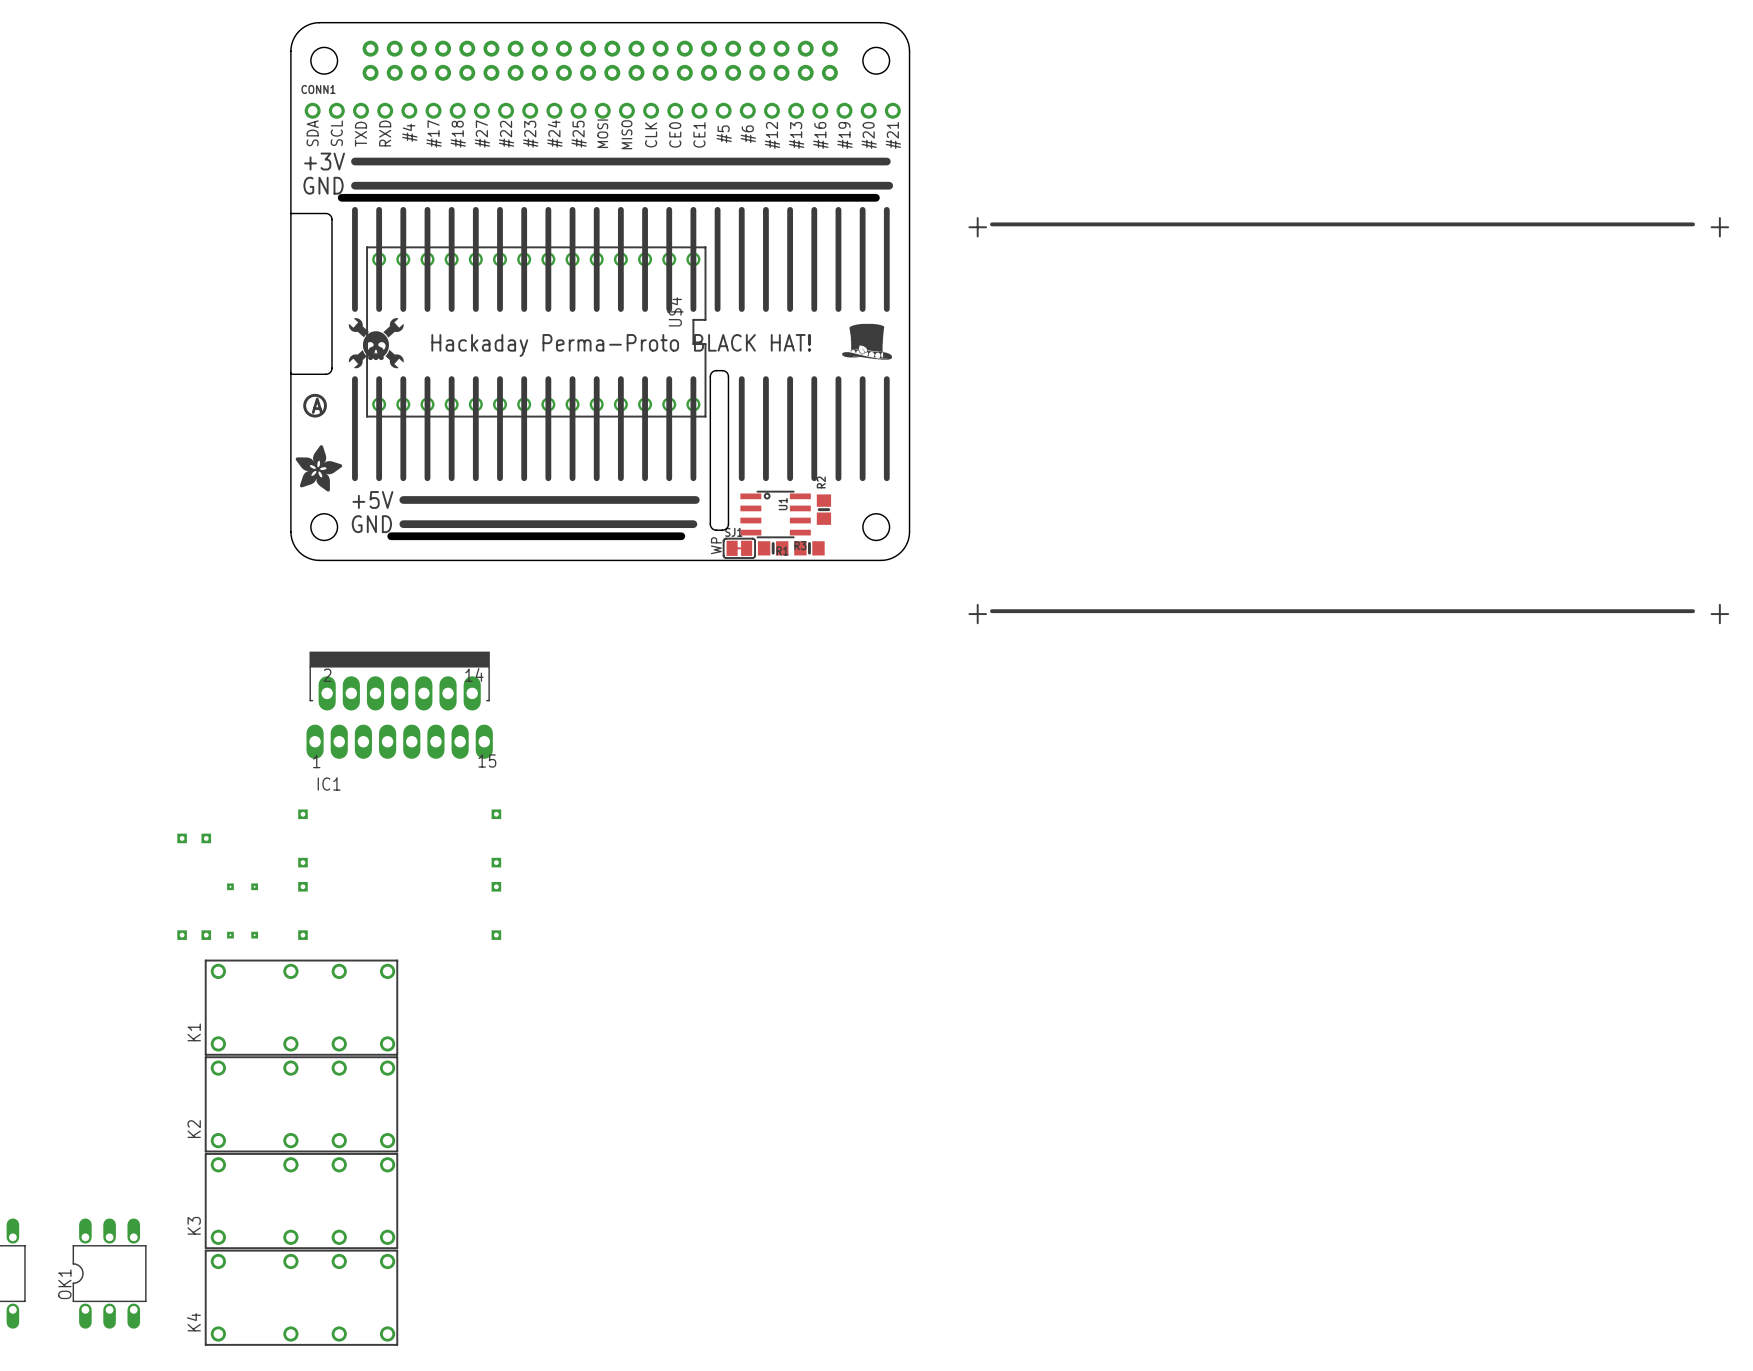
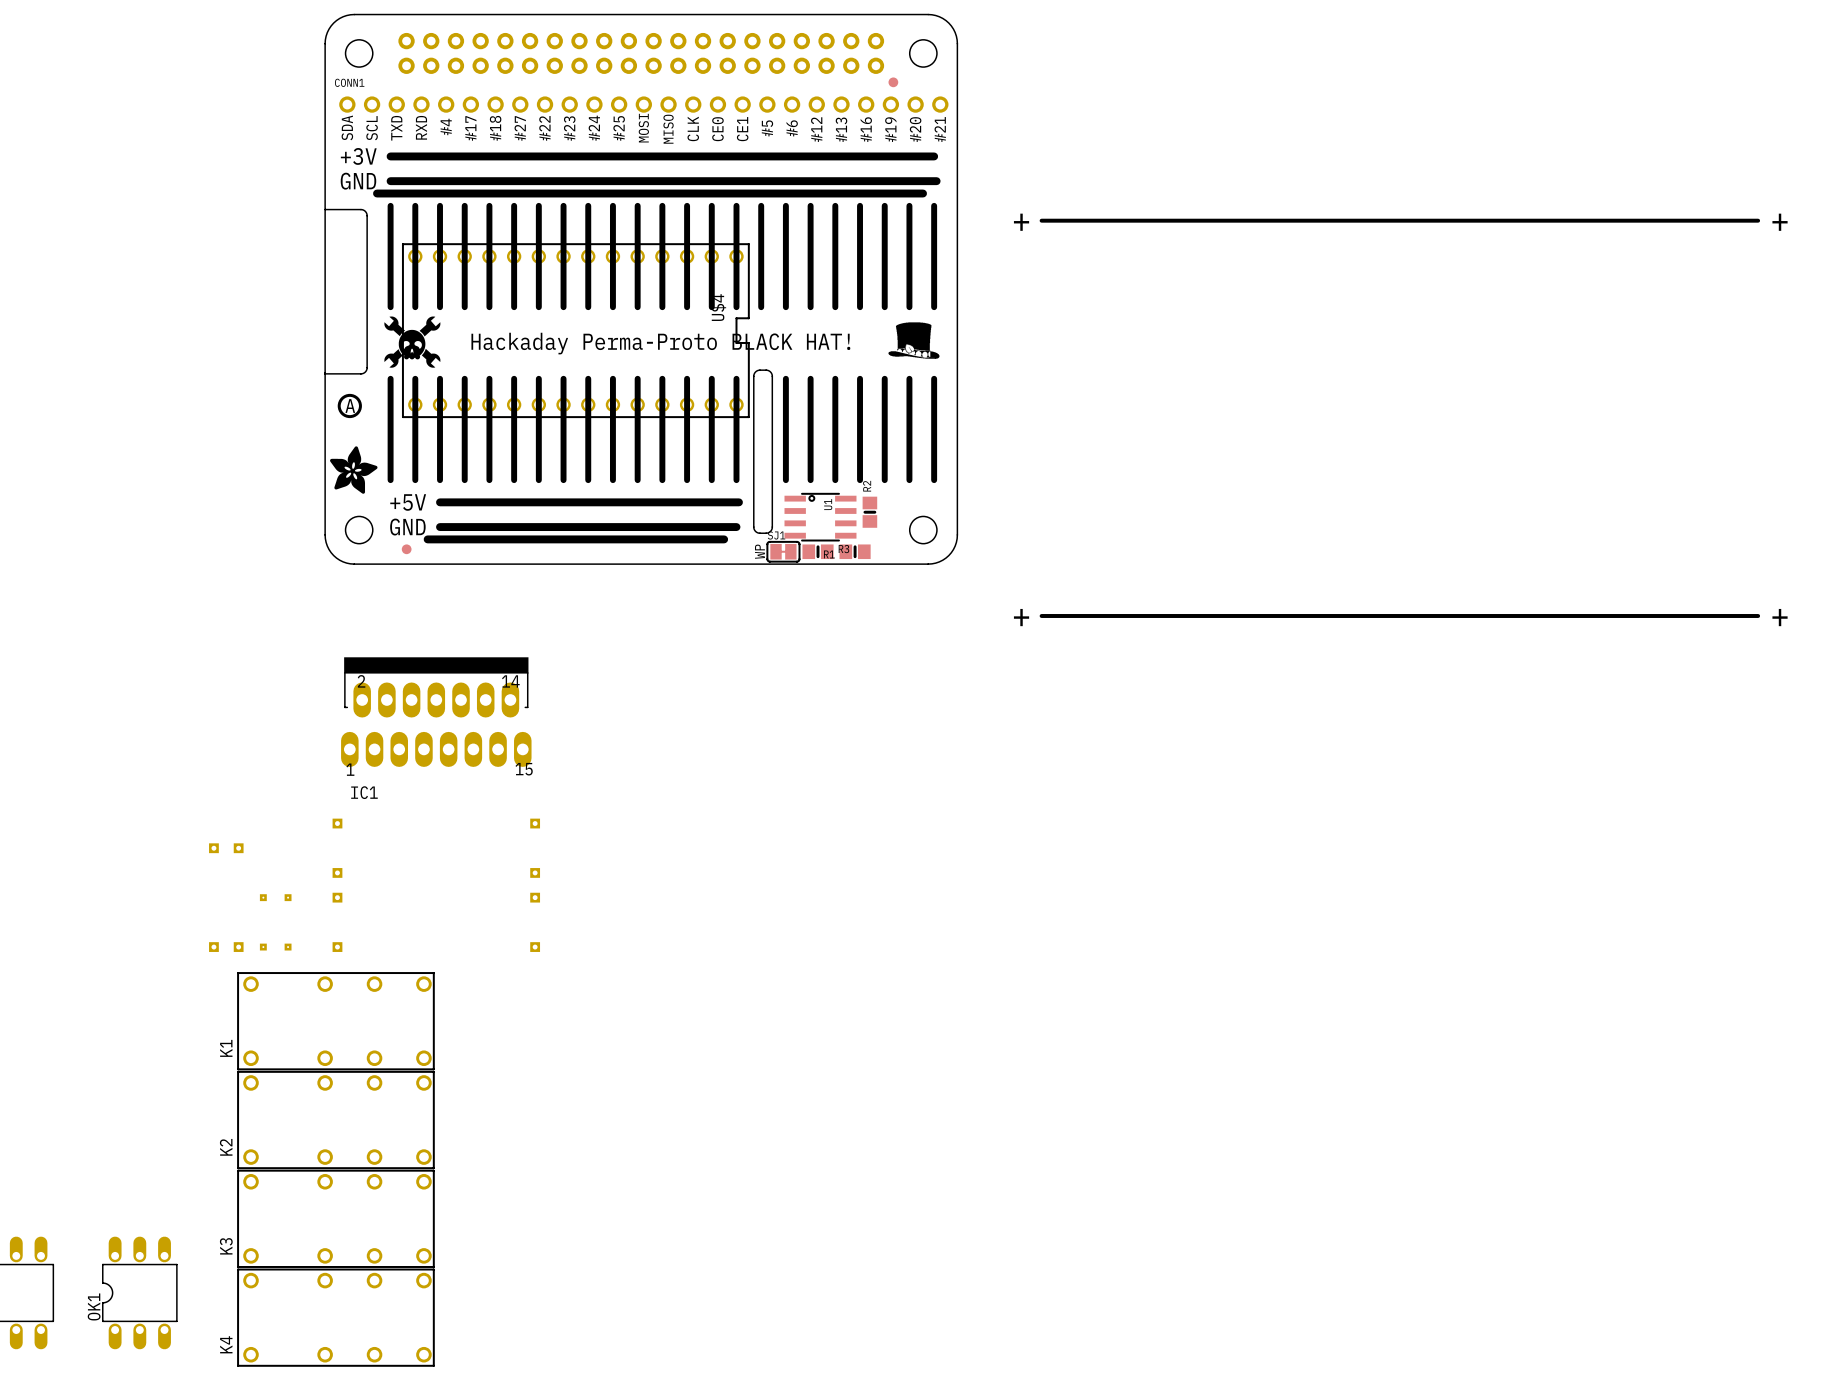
part: none -> (893, 82)
part: none -> (406, 549)

